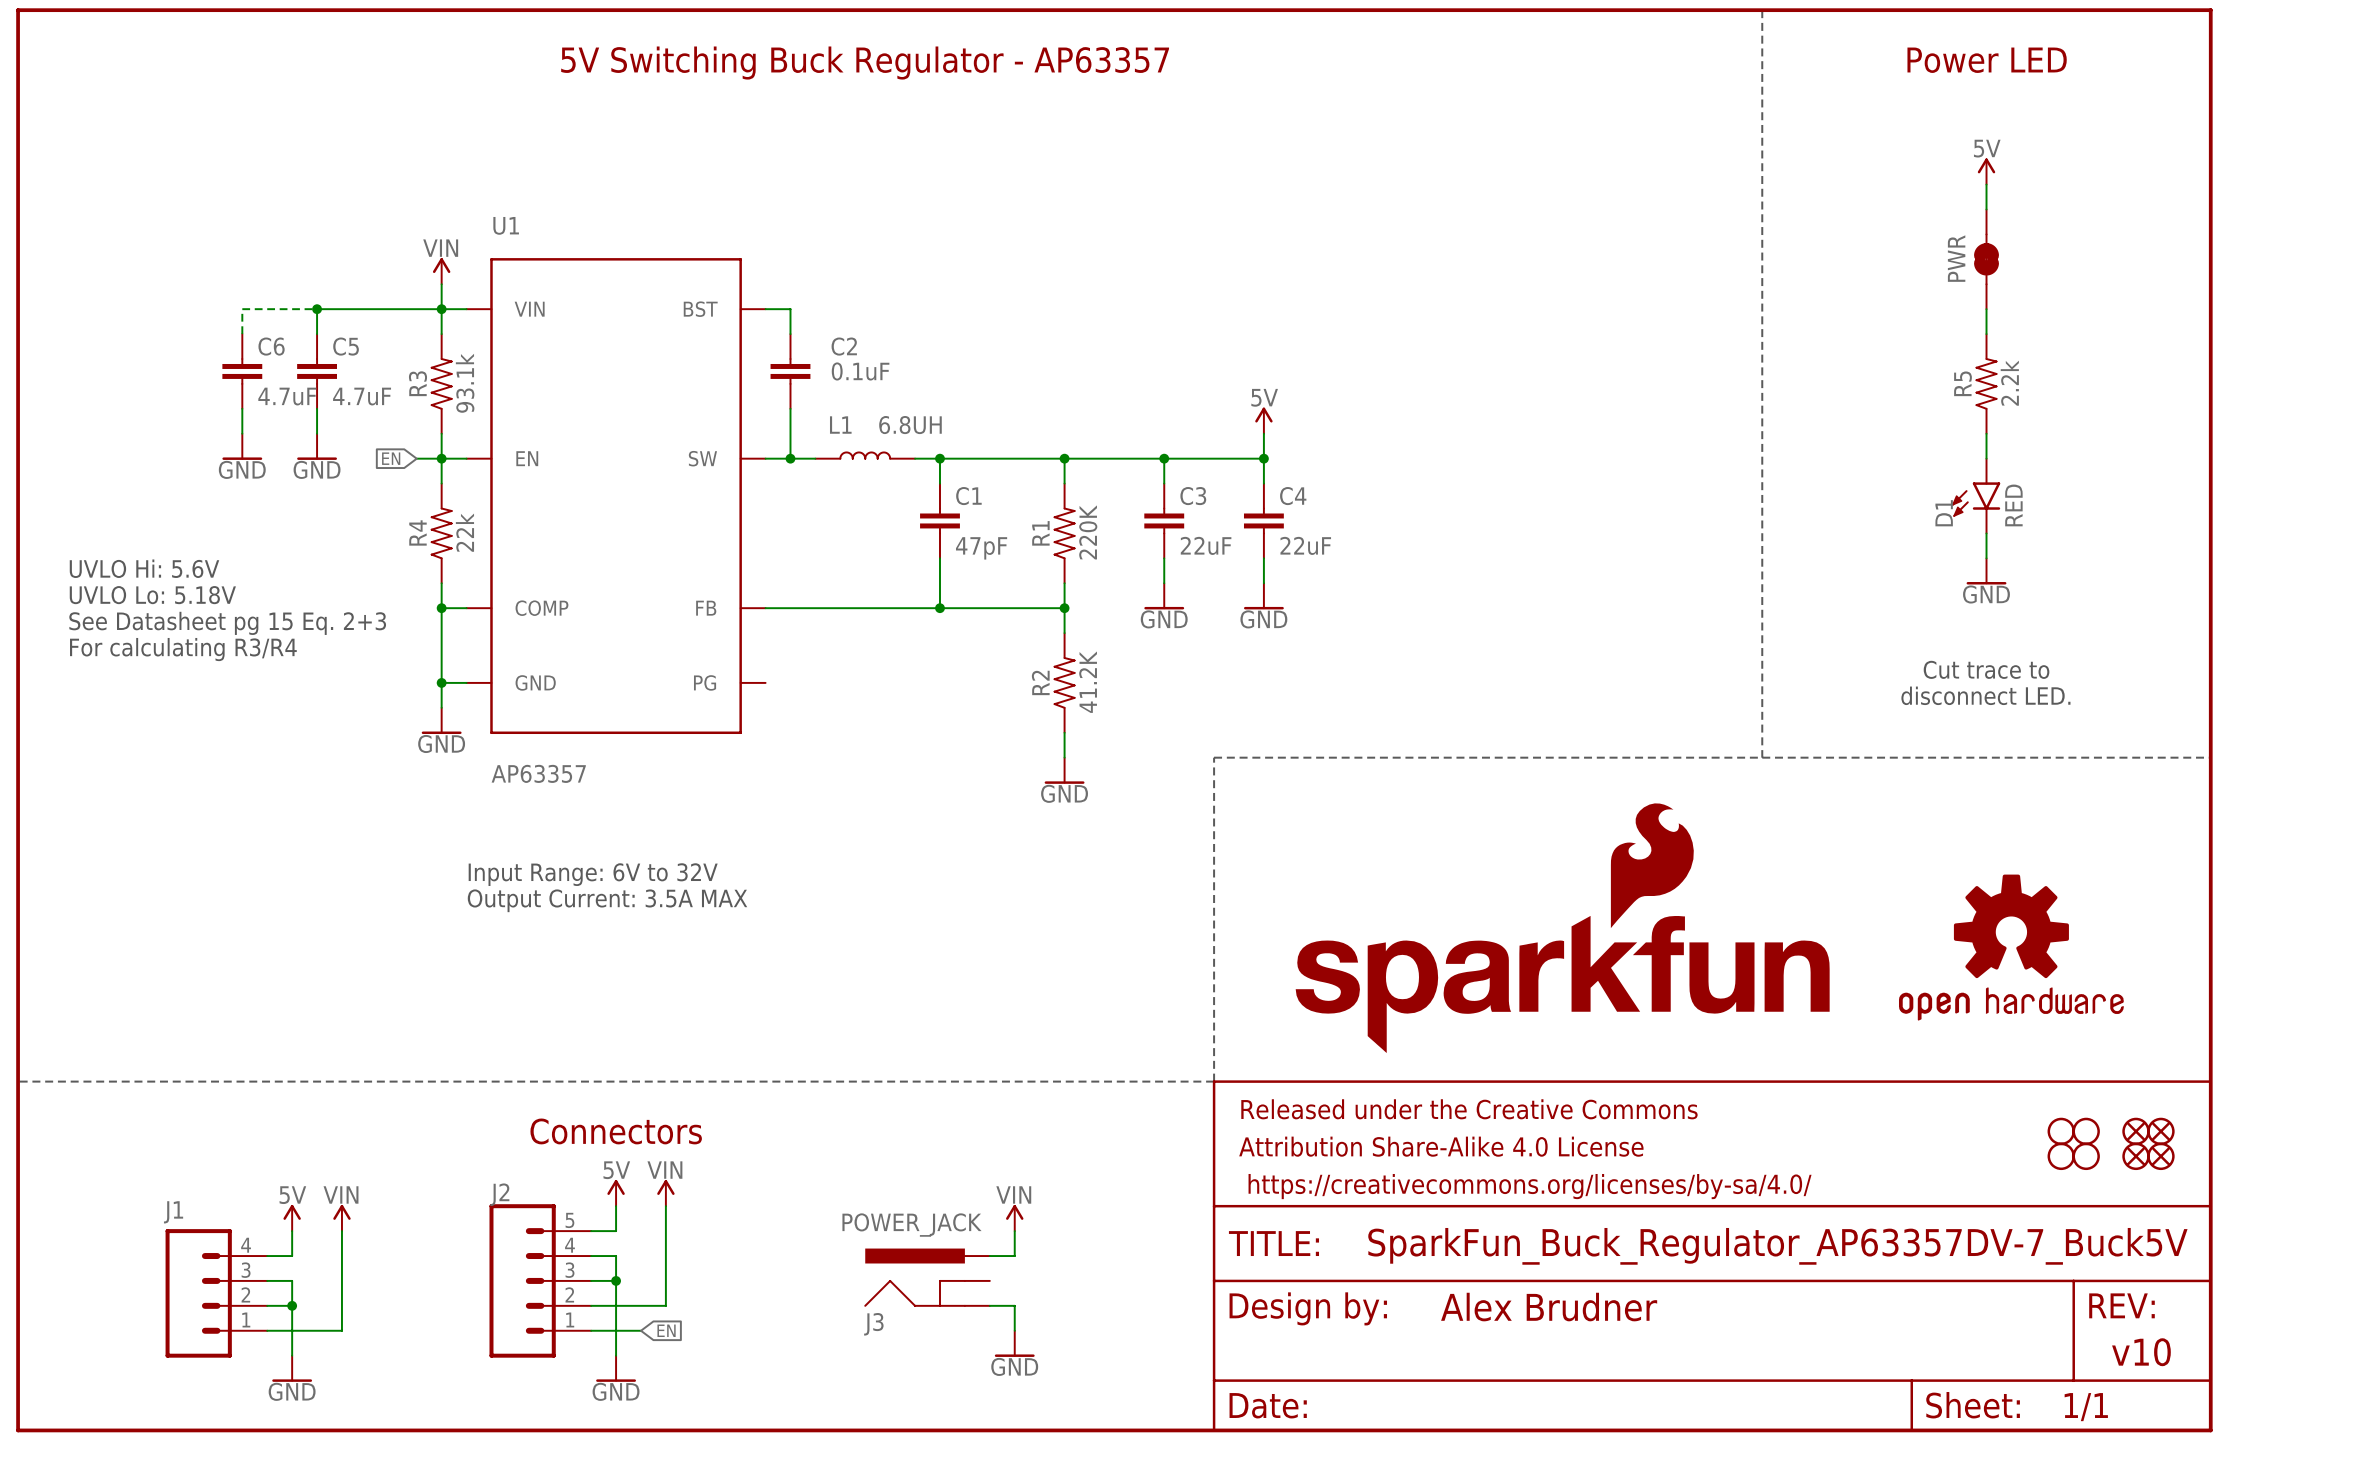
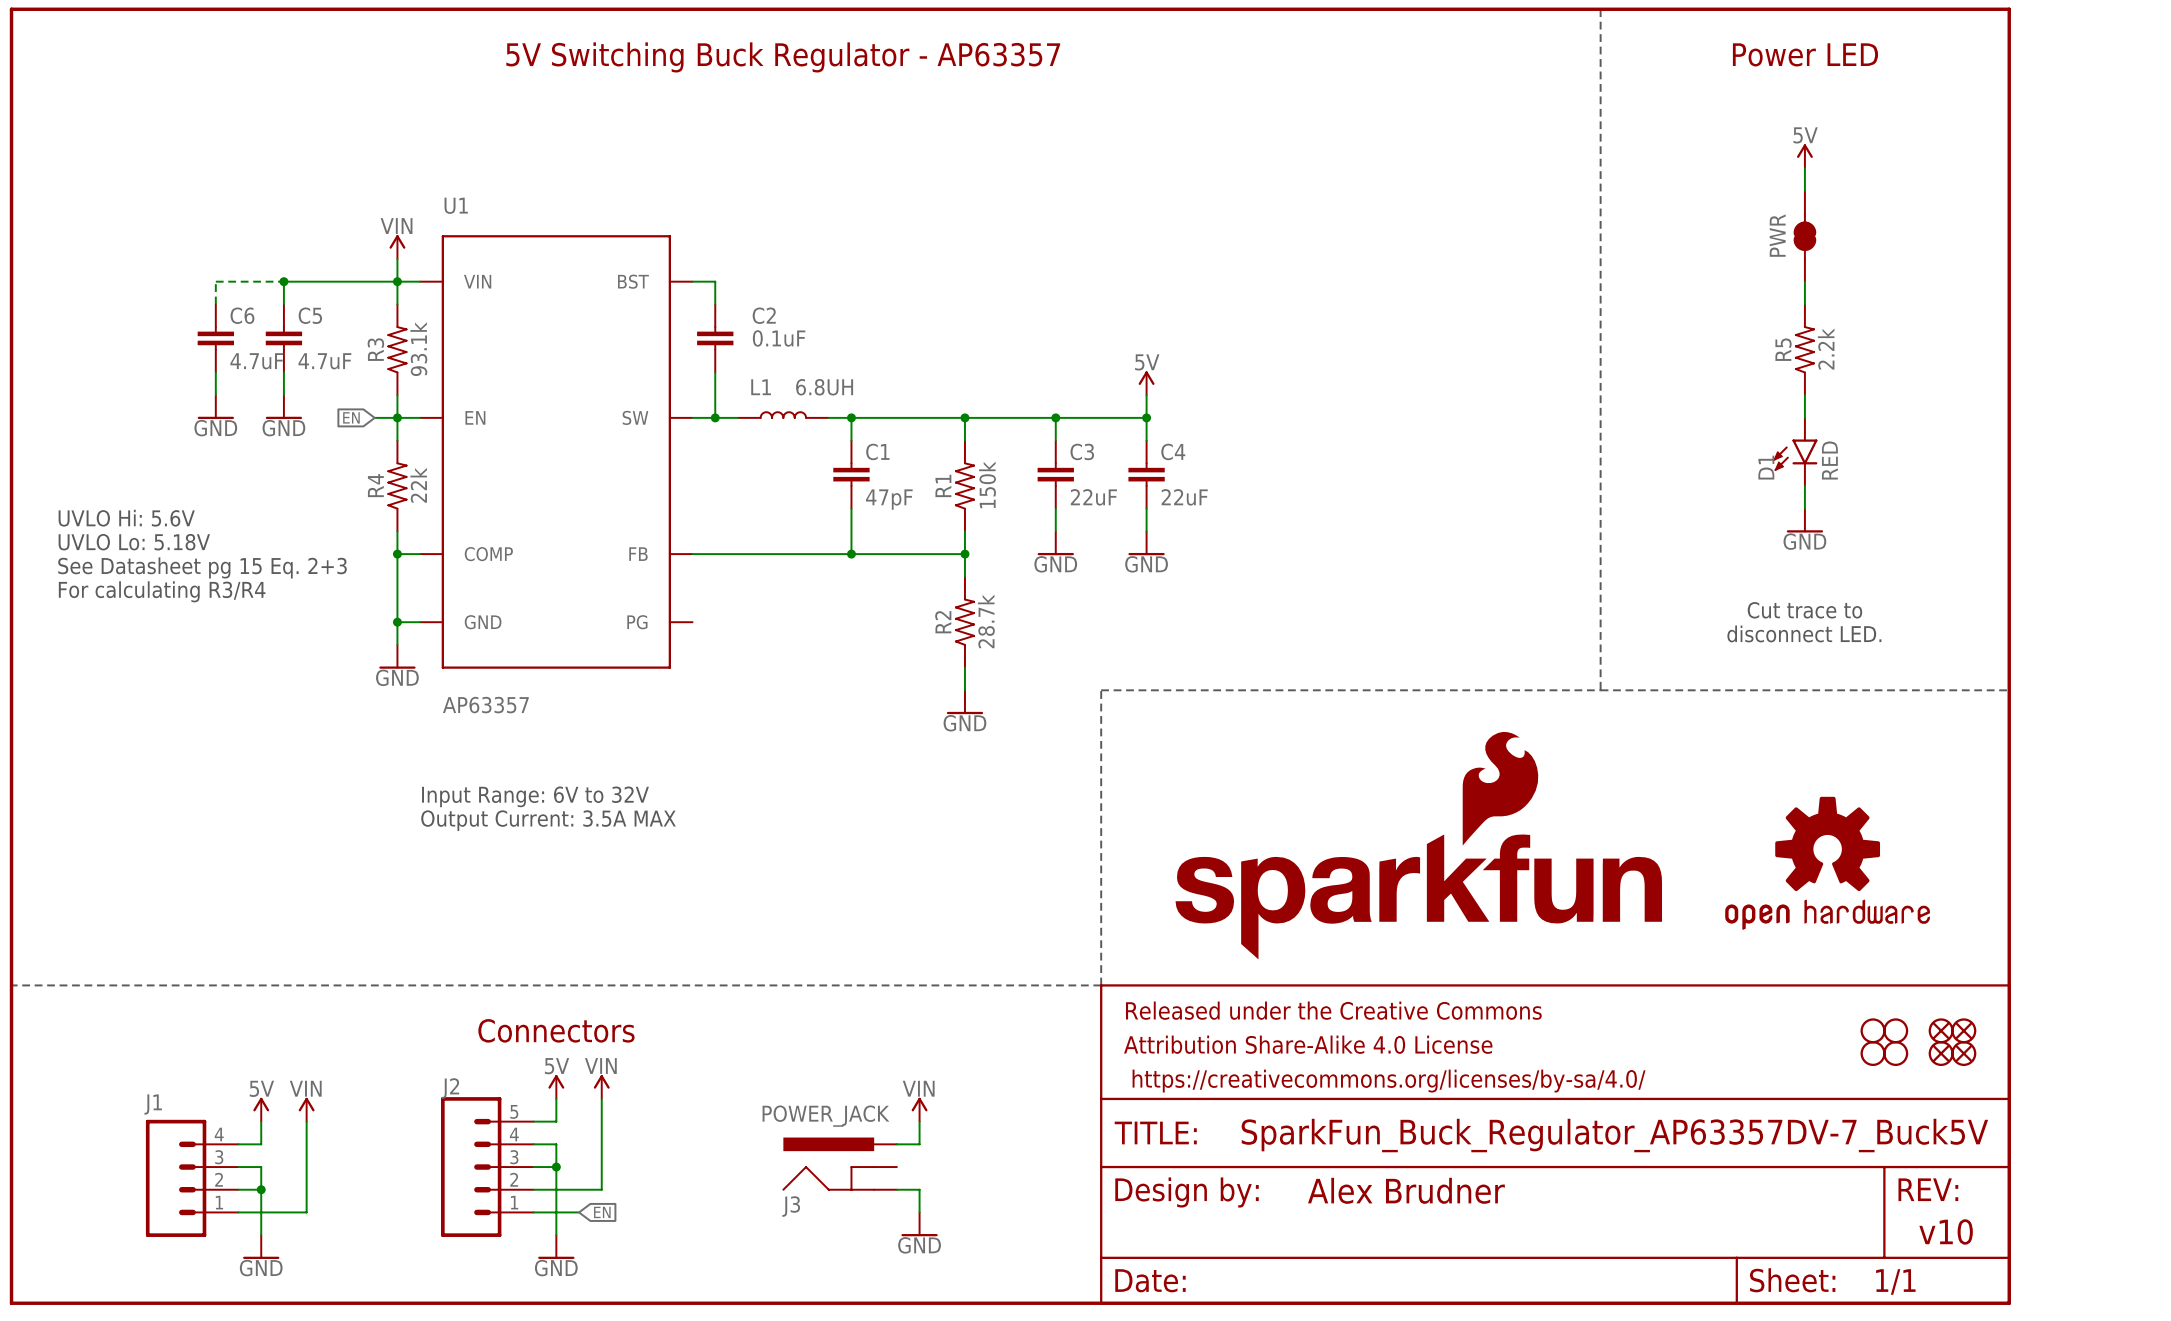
R1 value: 220K (1088, 532) -> none
R1 text: none -> 150k (987, 484)
R2 value: 41.2K (1088, 682) -> 28.7k (986, 621)

